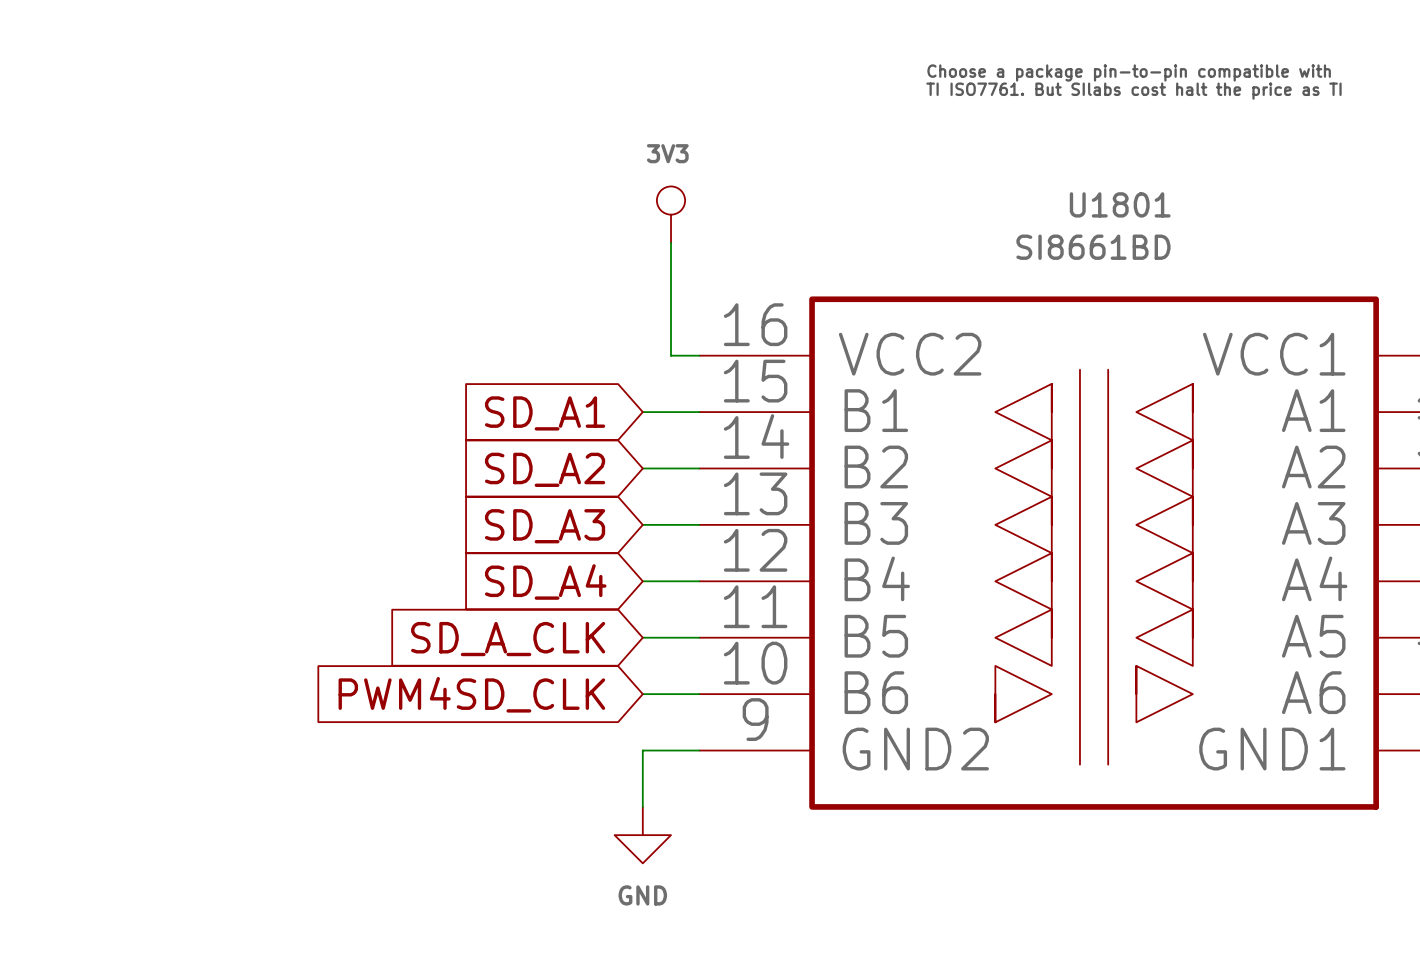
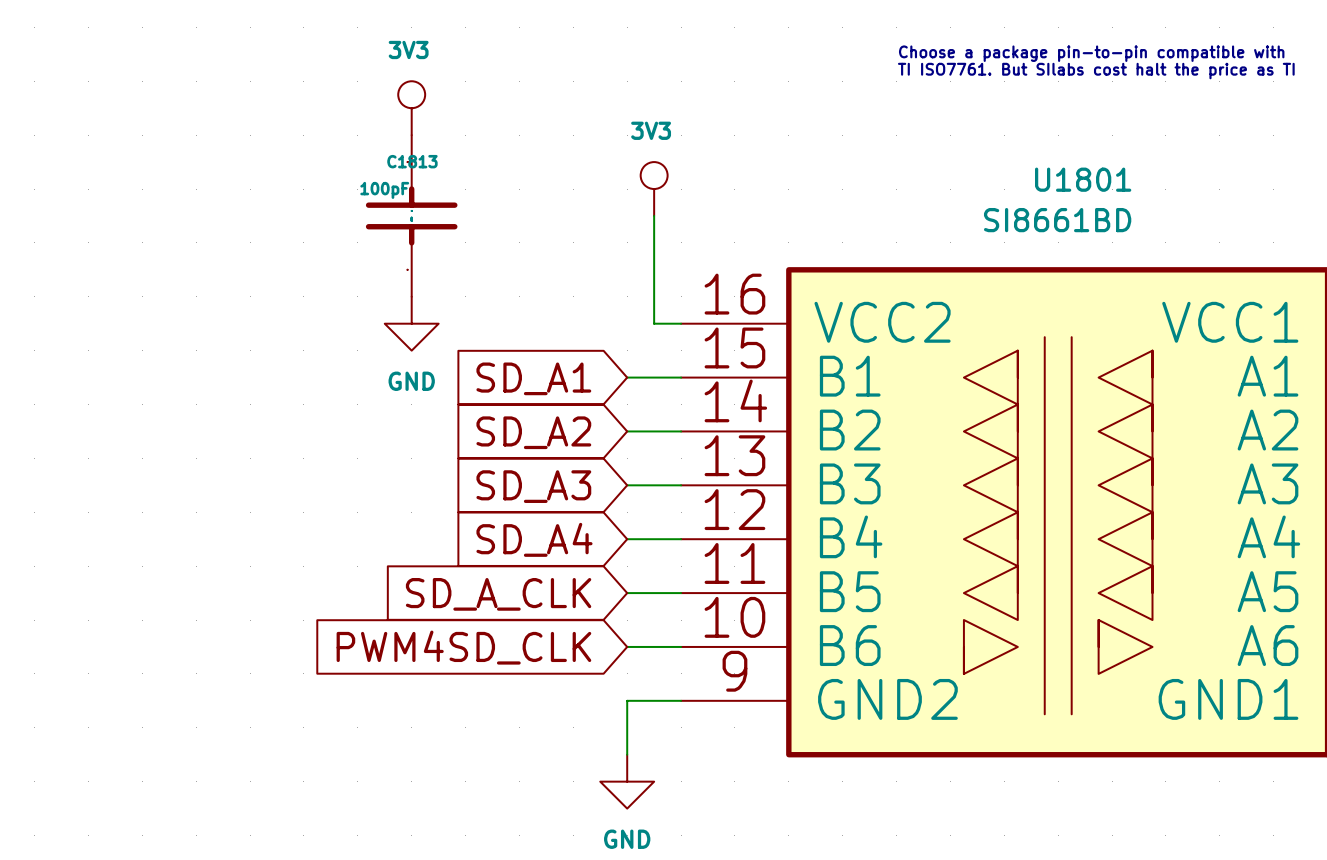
power symbol: none -> 3V3 (411, 108)
C1813: none -> 100pF (411, 215)
power symbol: none -> GND (411, 323)

